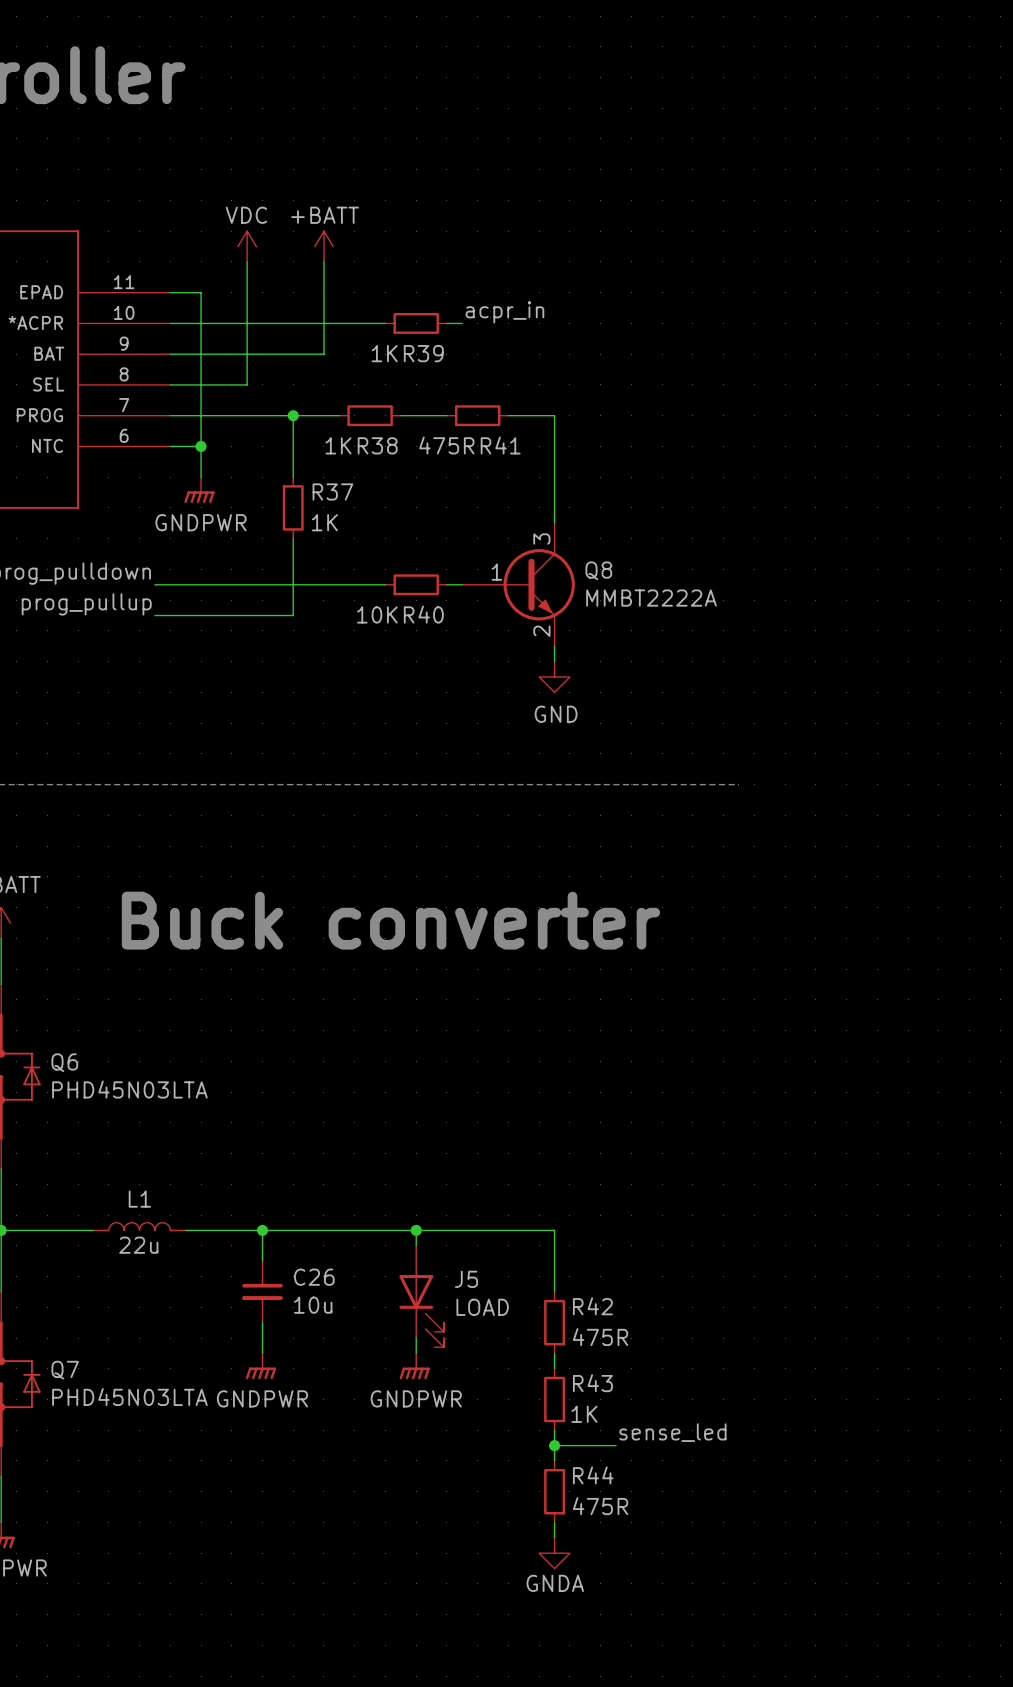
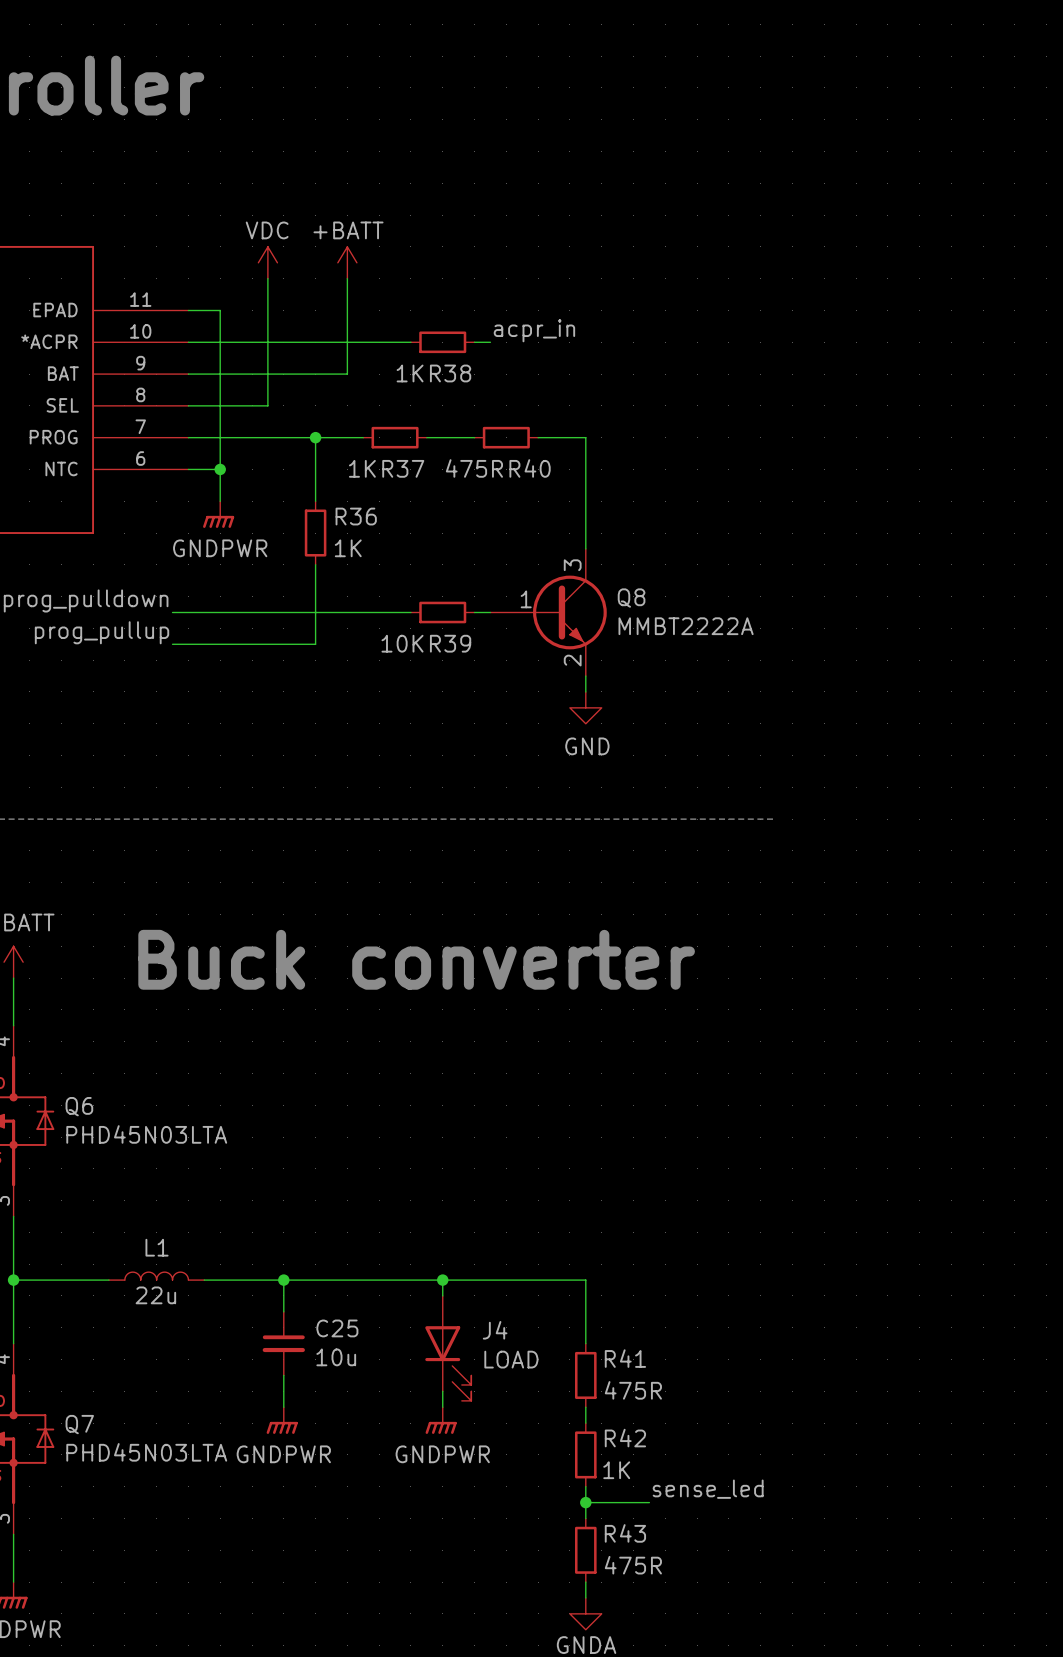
R39 name: R39 (423, 353) -> R38 (450, 373)
R38 name: R38 (377, 445) -> R37 (403, 468)
R41 name: R41 (500, 445) -> R40 (530, 468)
R37 name: R37 (332, 491) -> R36 (356, 516)
R40 name: R40 (423, 614) -> R39 (450, 643)
C26 name: C26 (314, 1277) -> C25 (337, 1328)
J5 name: J5 (466, 1279) -> J4 (495, 1330)
R42 name: R42 (592, 1306) -> R41 (625, 1358)
R43 name: R43 (592, 1383) -> R42 (625, 1438)
R44 name: R44 (593, 1475) -> R43 (625, 1533)

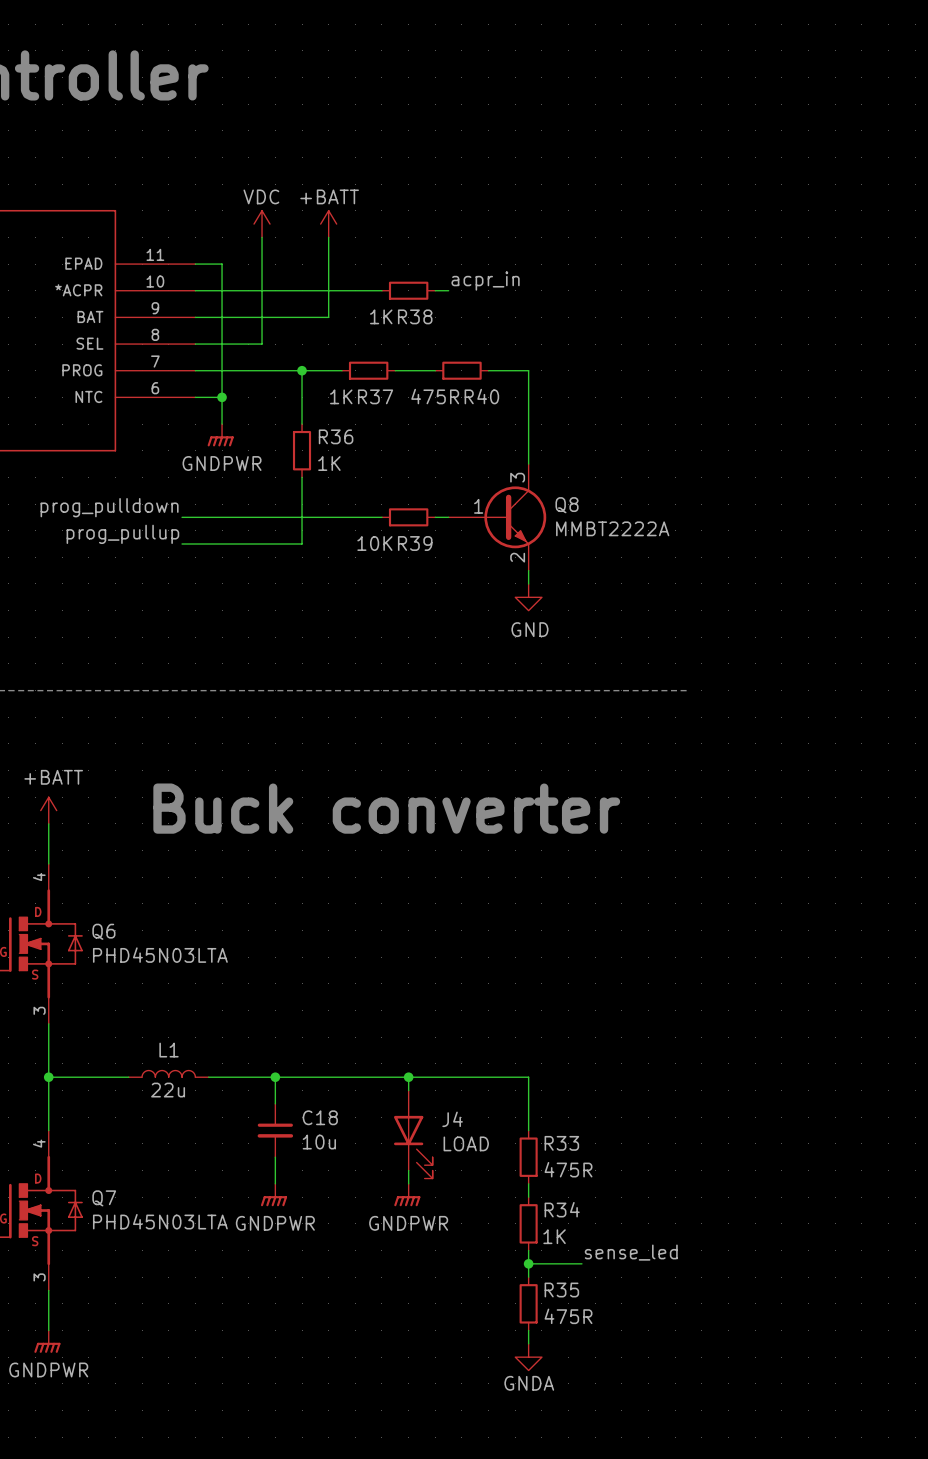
C25 name: C25 (337, 1328) -> C18 (320, 1117)
R41 name: R41 (625, 1358) -> R33 (561, 1143)
R42 name: R42 (625, 1438) -> R34 (562, 1209)
R43 name: R43 (625, 1533) -> R35 (561, 1290)

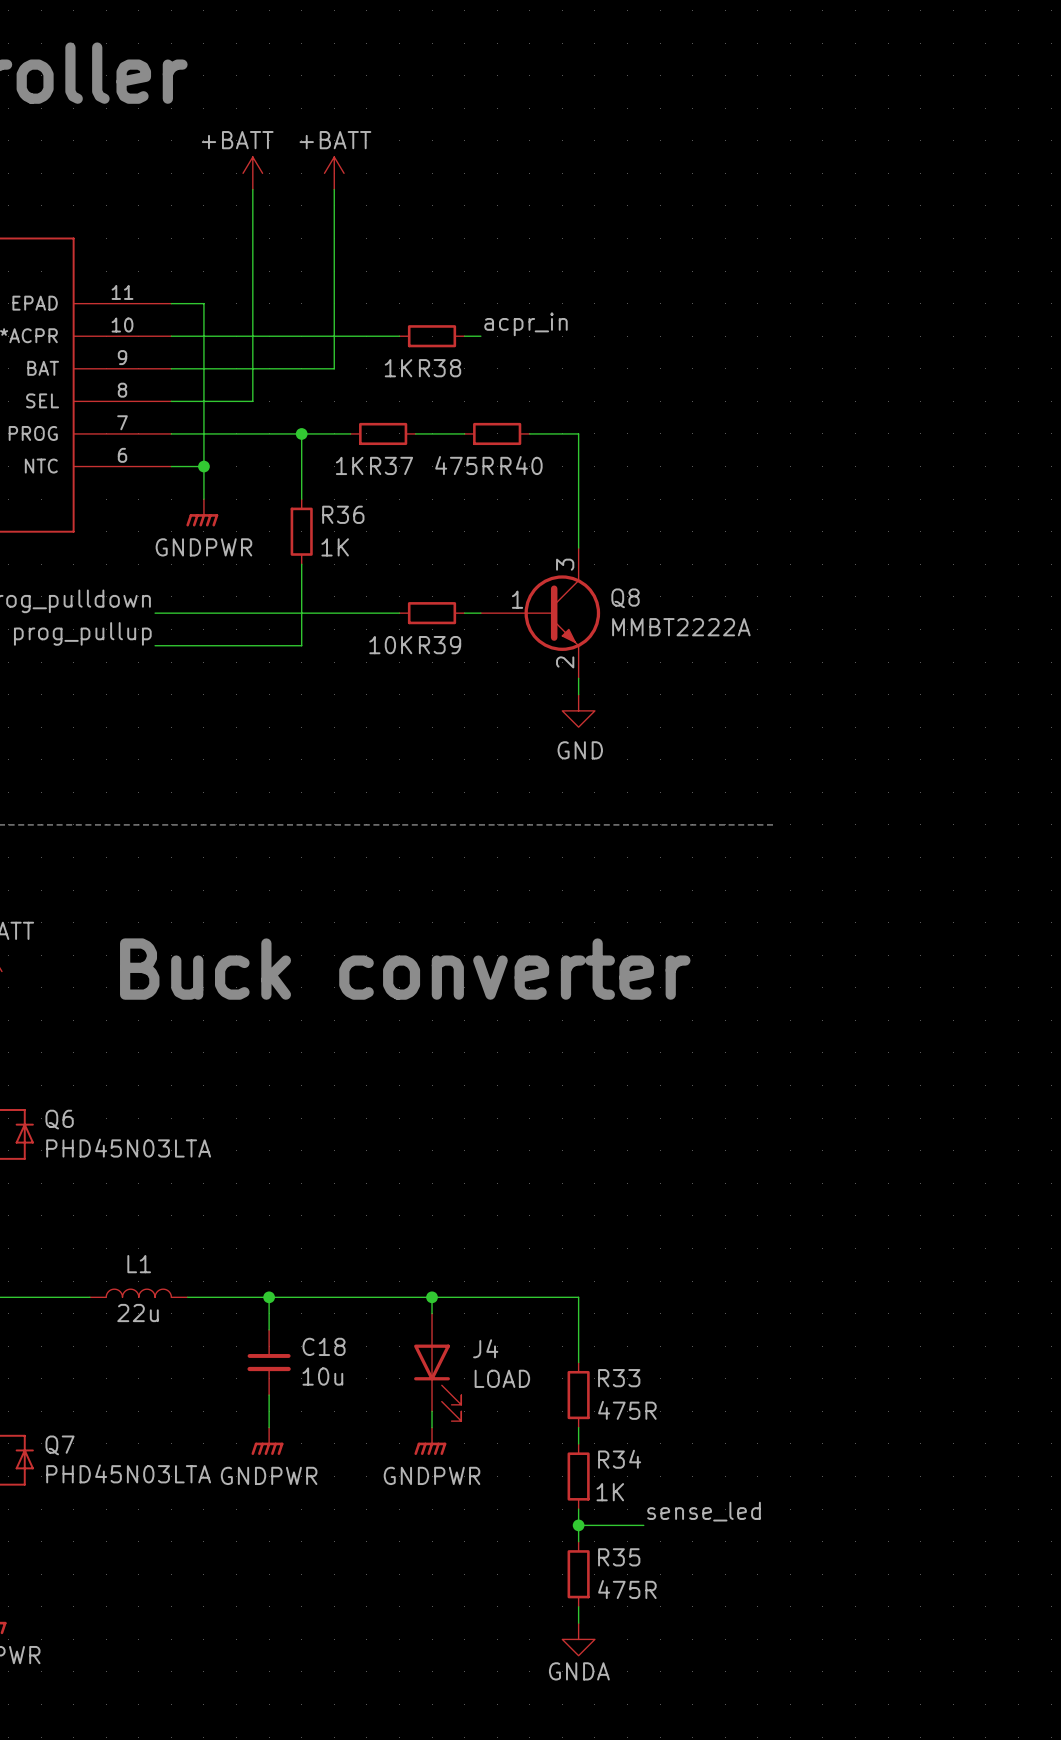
power symbol: none -> +BATT (252, 173)
power symbol: none -> +BATT (334, 173)
wire: none -> (252, 189) (252, 271)
wire: none -> (334, 189) (334, 271)
power symbol: VDC (262, 224) -> none
power symbol: +BATT (328, 224) -> none

